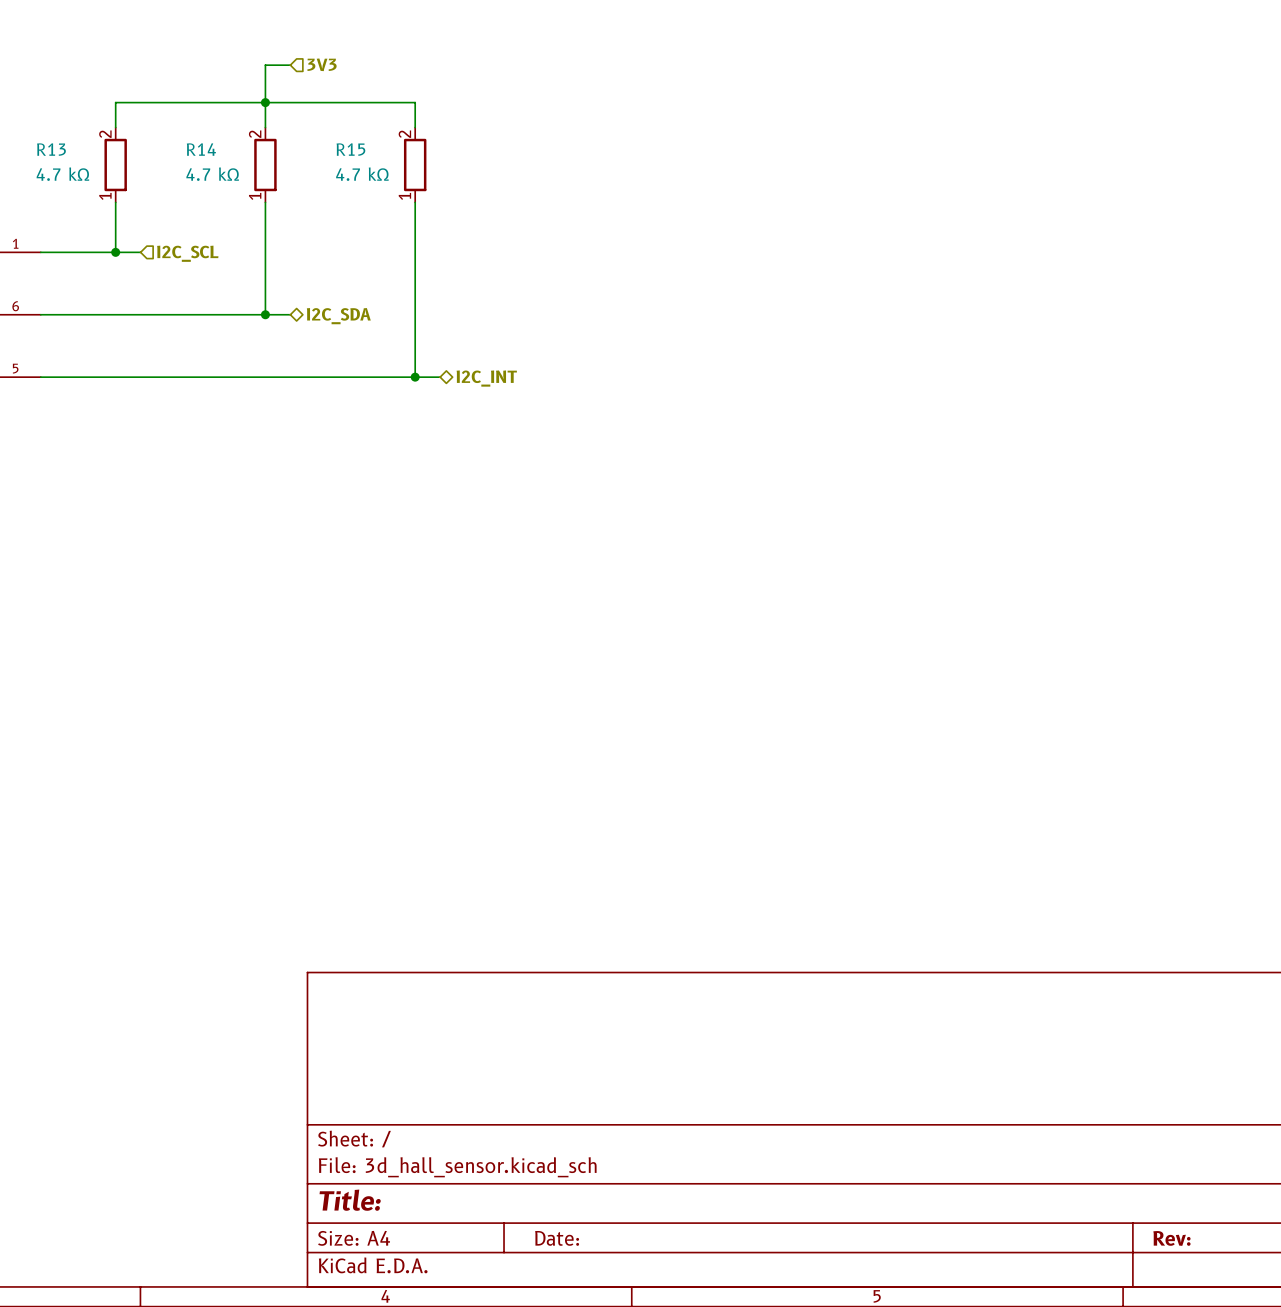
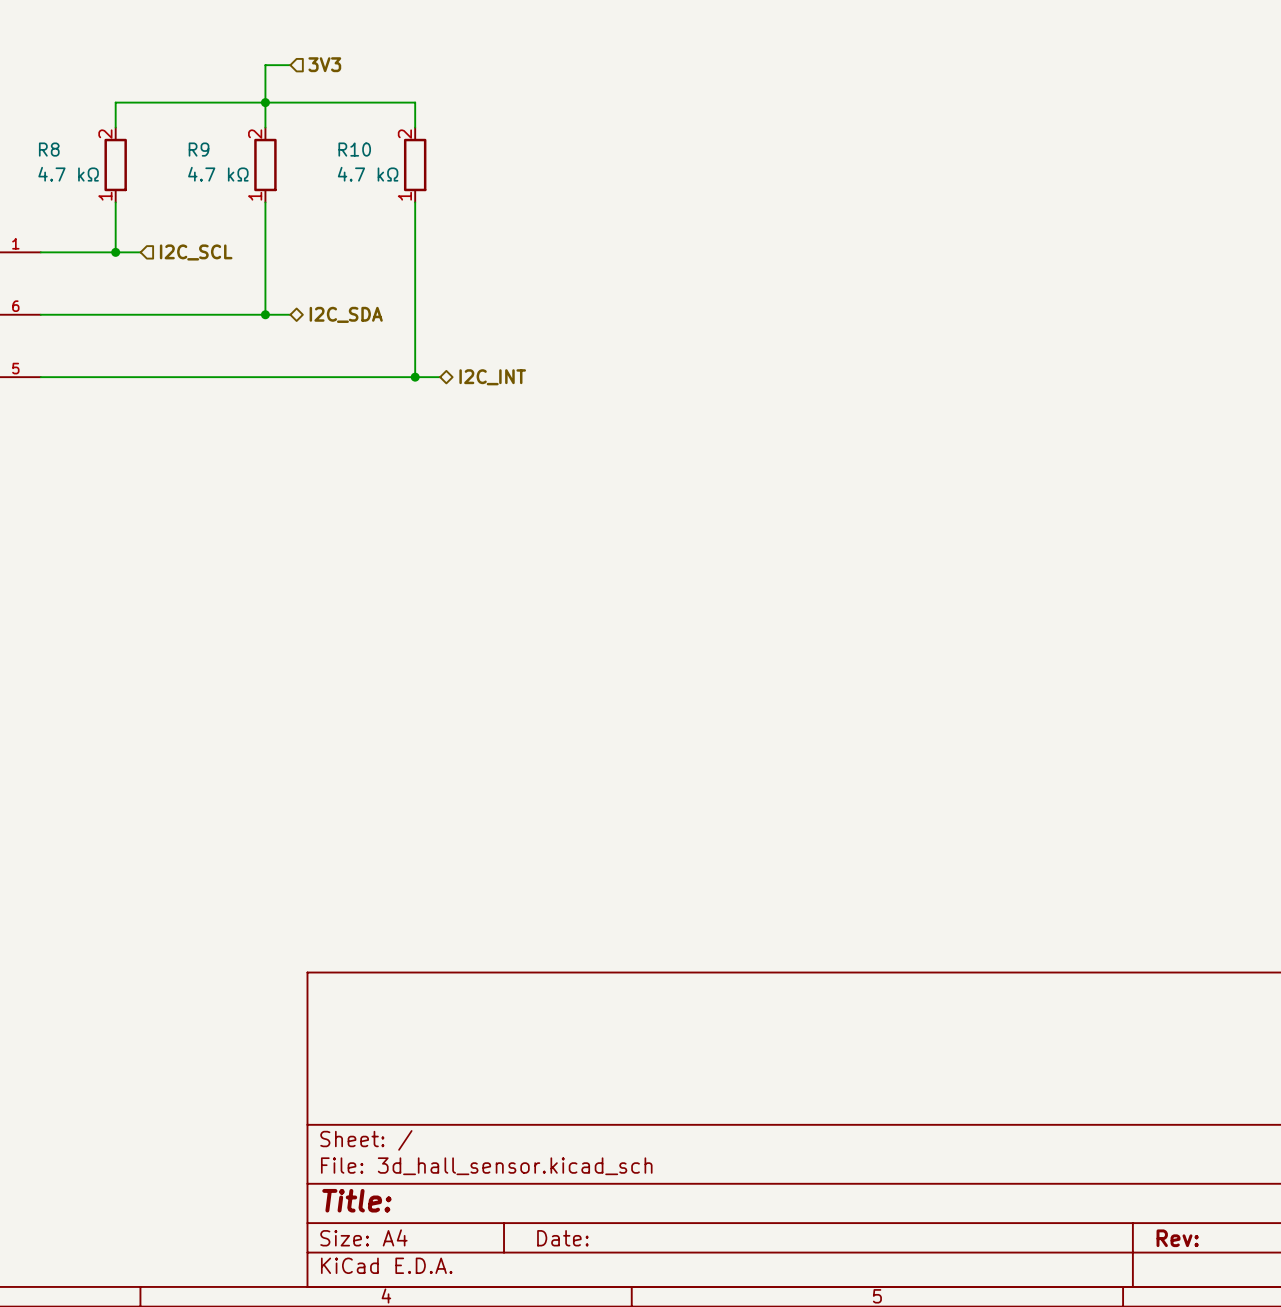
R13 name: R13 (51, 149) -> R8 (49, 149)
R14 name: R14 (201, 149) -> R9 (199, 149)
R15 name: R15 (350, 149) -> R10 (354, 149)

